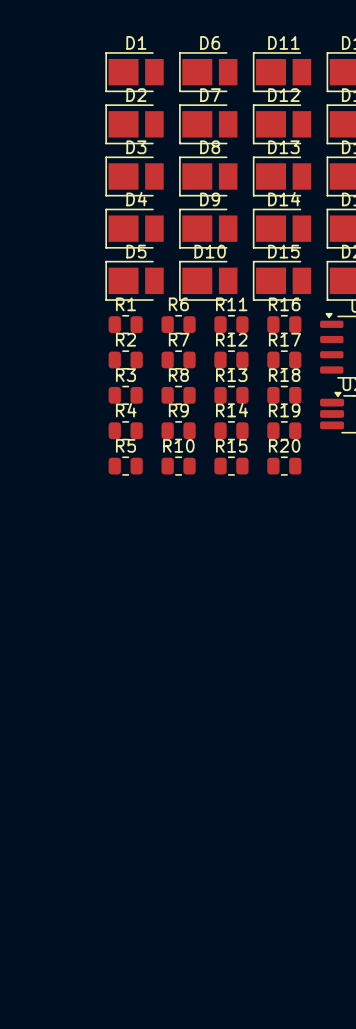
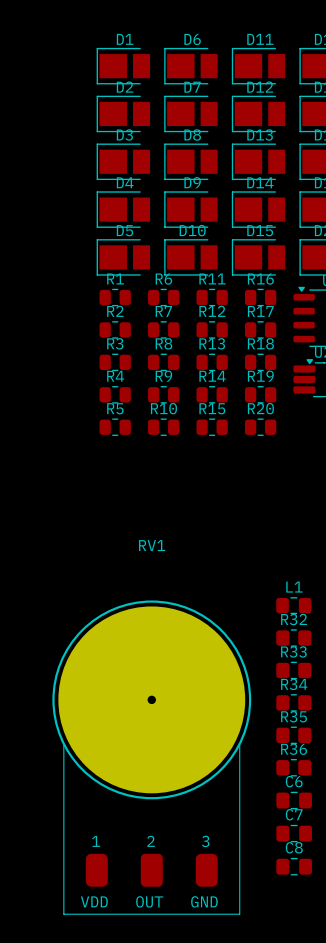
L1: none -> (293, 605)
R32: none -> (293, 638)
R33: none -> (293, 670)
R34: none -> (293, 702)
R35: none -> (293, 735)
RV1: none -> (151, 757)
R36: none -> (293, 767)
C6: none -> (294, 800)
C7: none -> (294, 833)
C8: none -> (294, 866)

